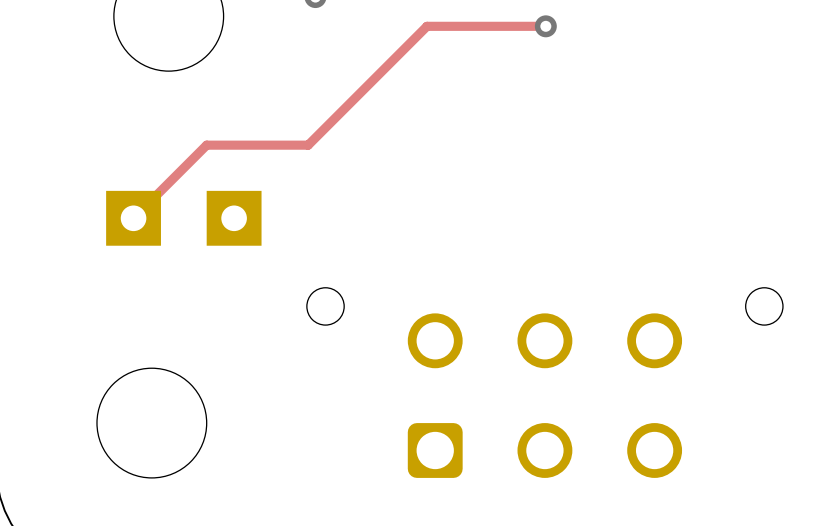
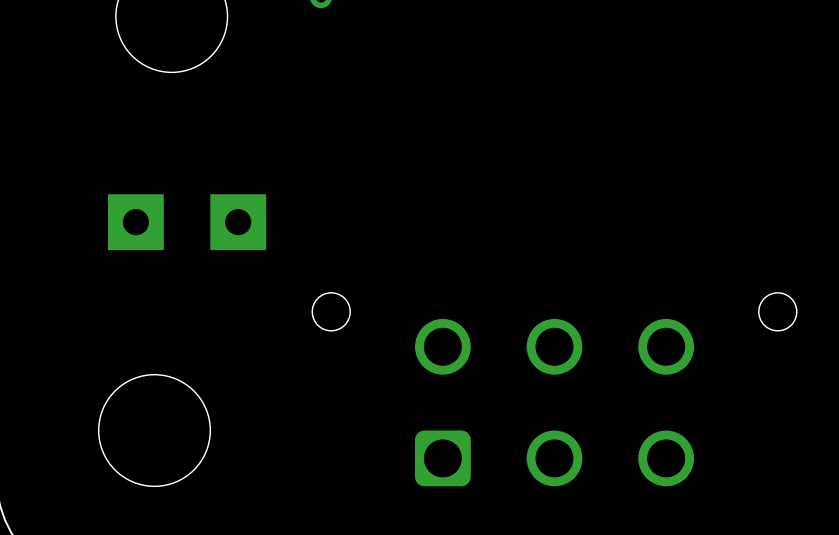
track: (545, 26) (427, 26) (308, 145) (206, 145) (133, 218) -> none
via: (545, 26) -> none

